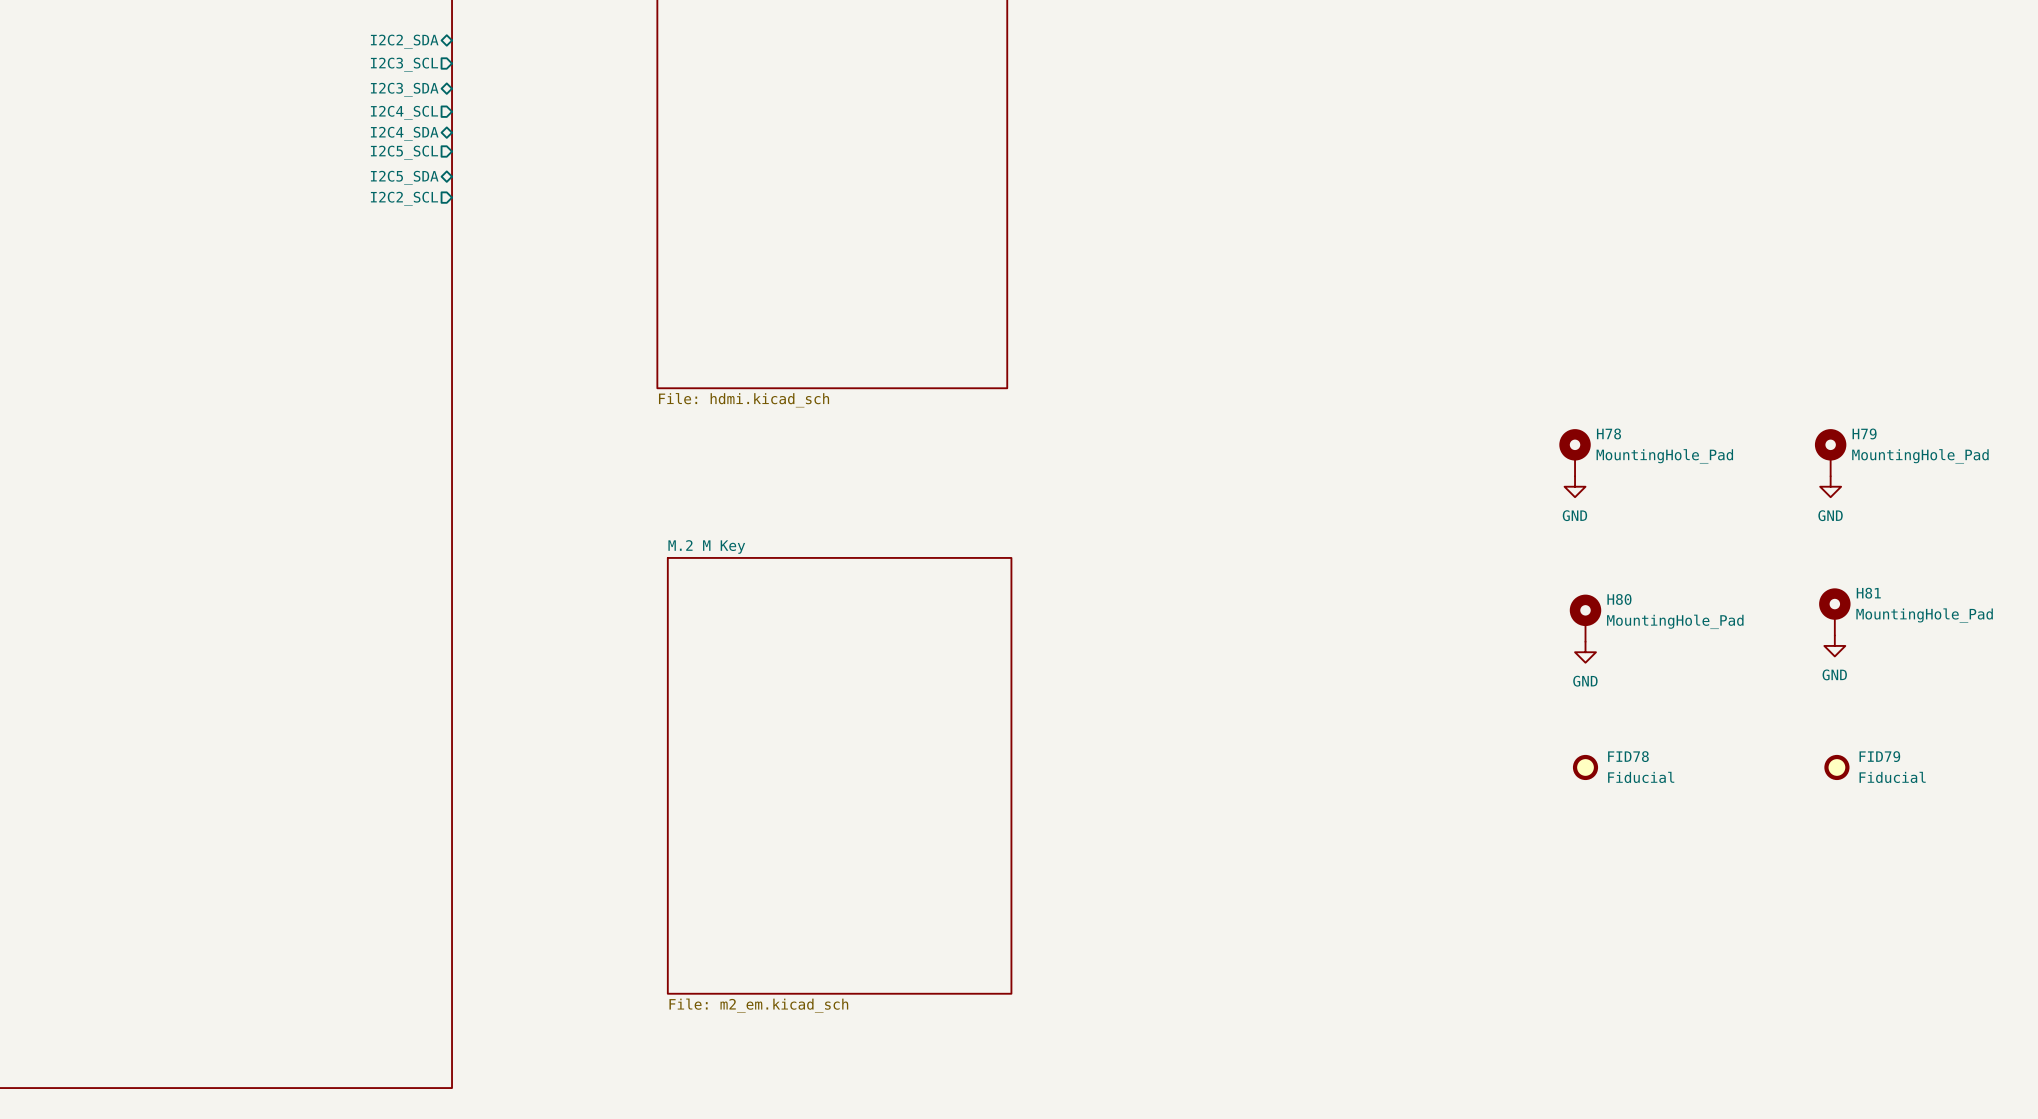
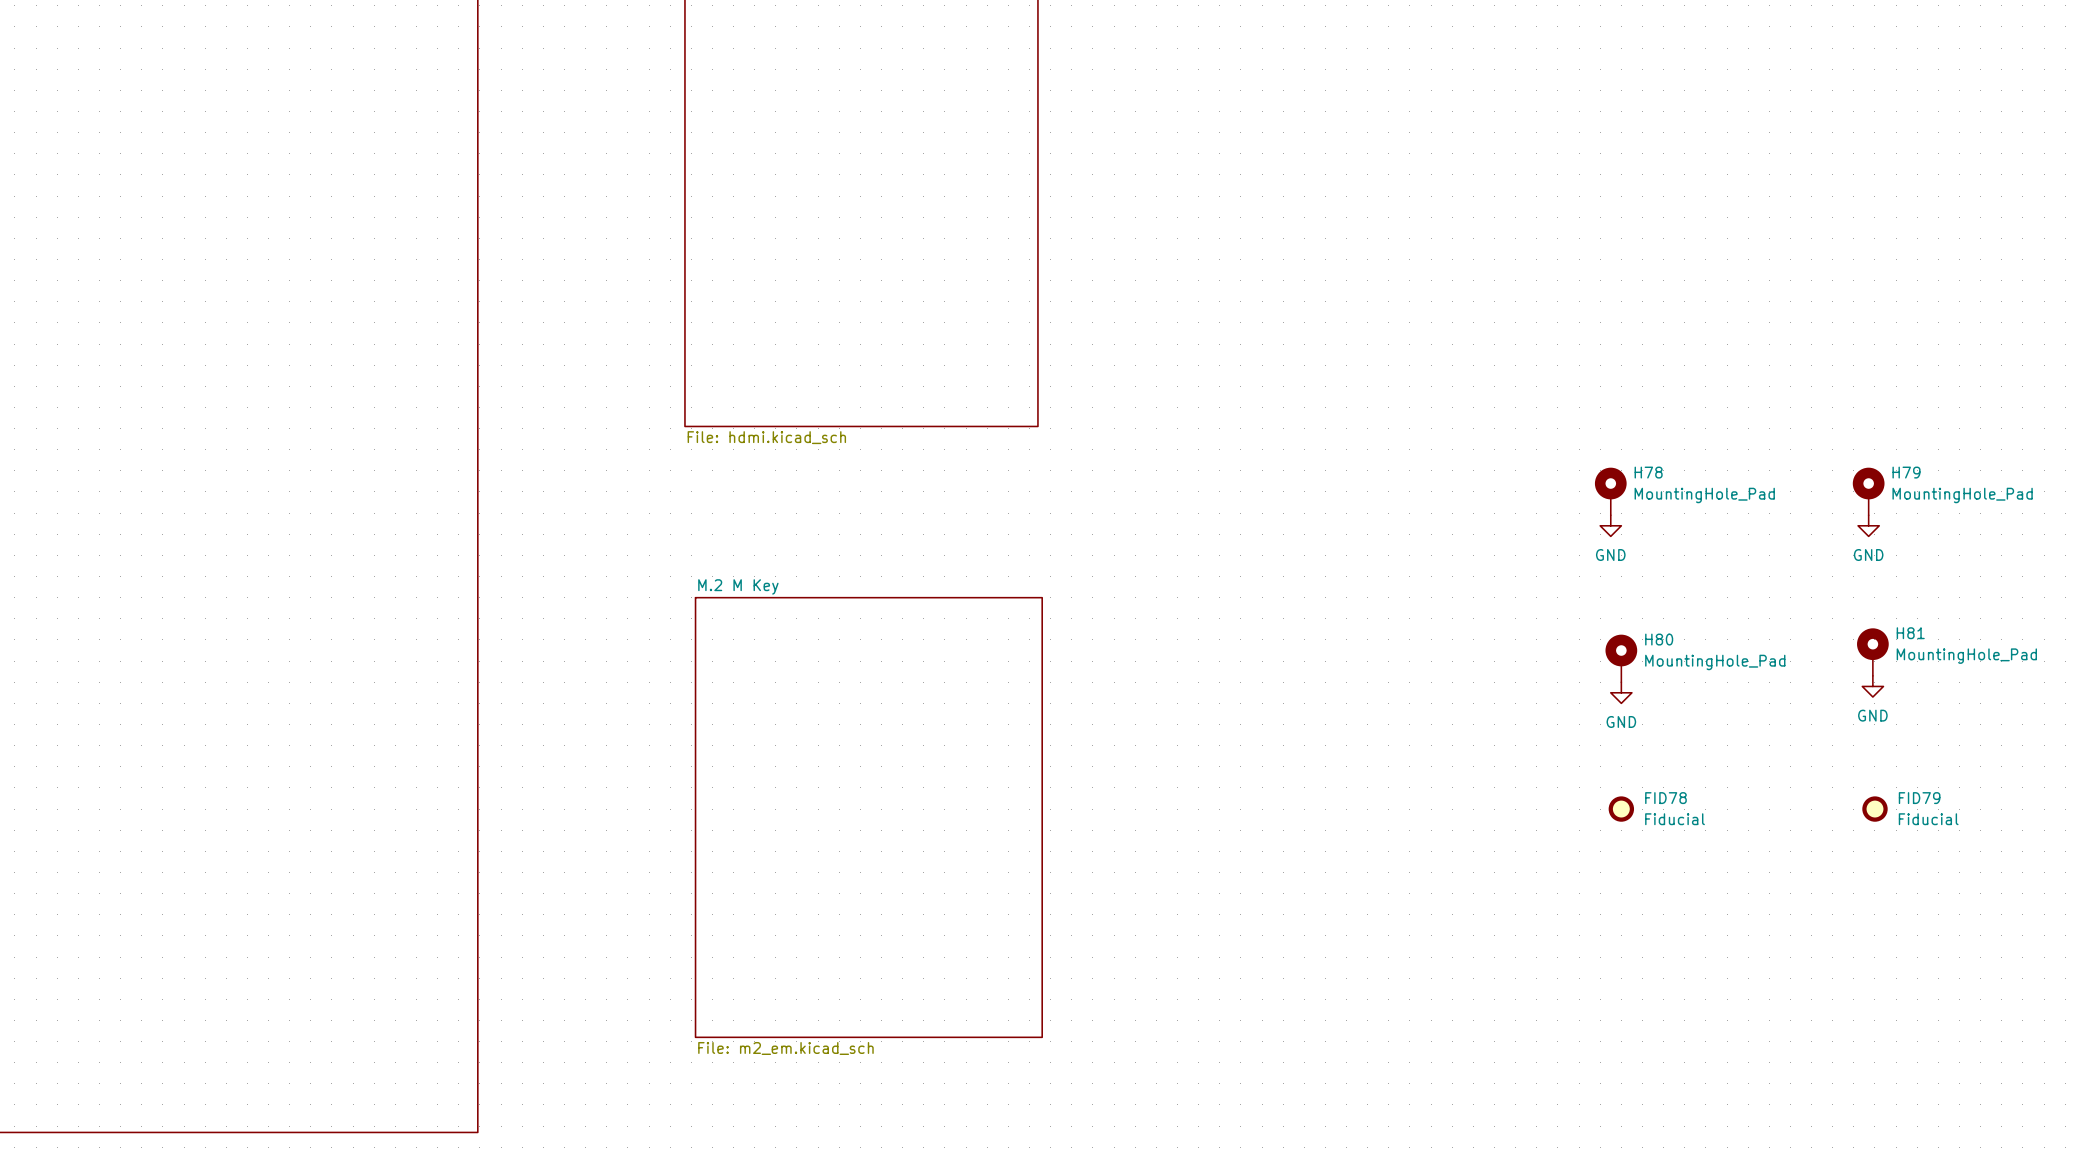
sheet pin: I2C2_SDA (404, 41) -> none
sheet pin: I2C3_SCL (404, 64) -> none
sheet pin: I2C3_SDA (404, 89) -> none
sheet pin: I2C4_SCL (404, 112) -> none
sheet pin: I2C4_SDA (404, 133) -> none
sheet pin: I2C5_SCL (404, 152) -> none
sheet pin: I2C5_SDA (404, 177) -> none
sheet pin: I2C2_SCL (404, 198) -> none

